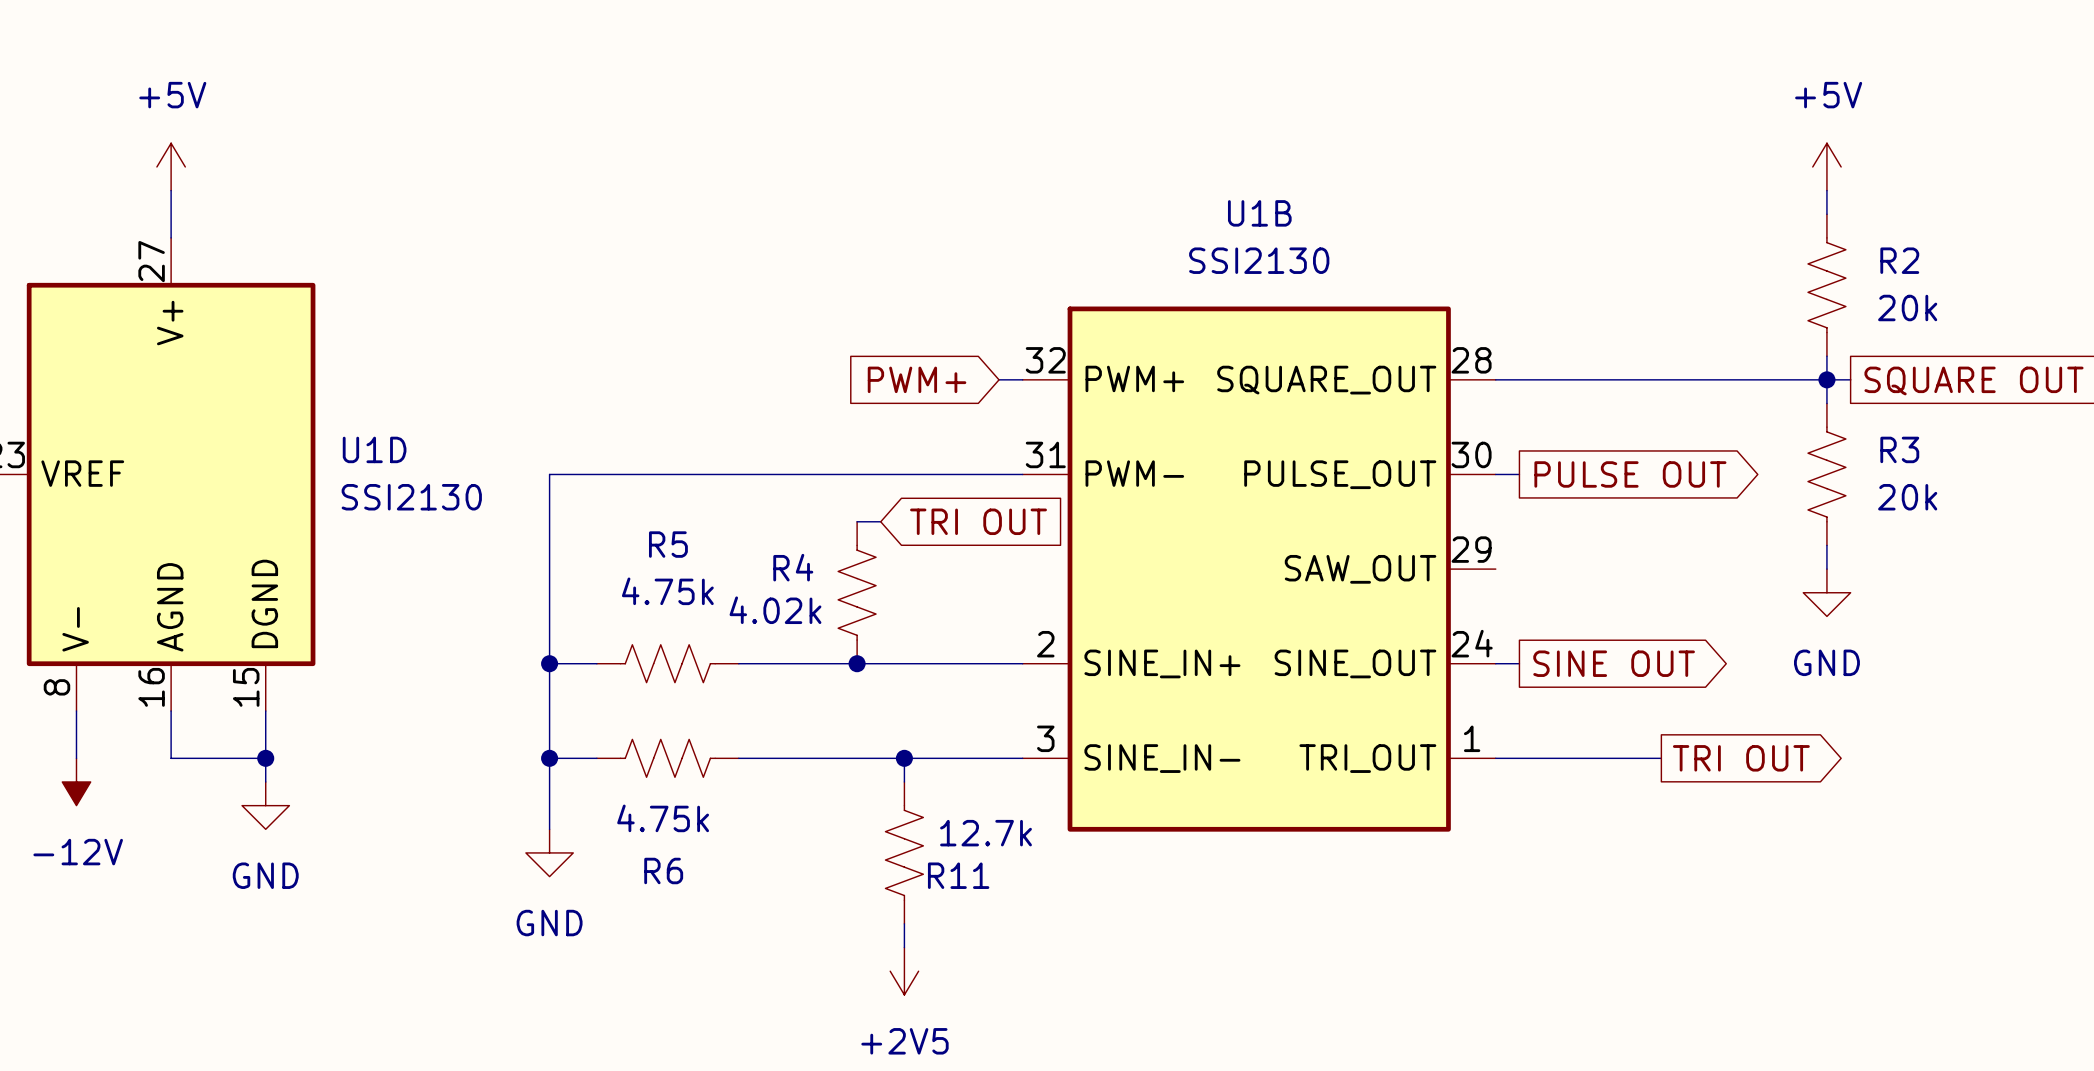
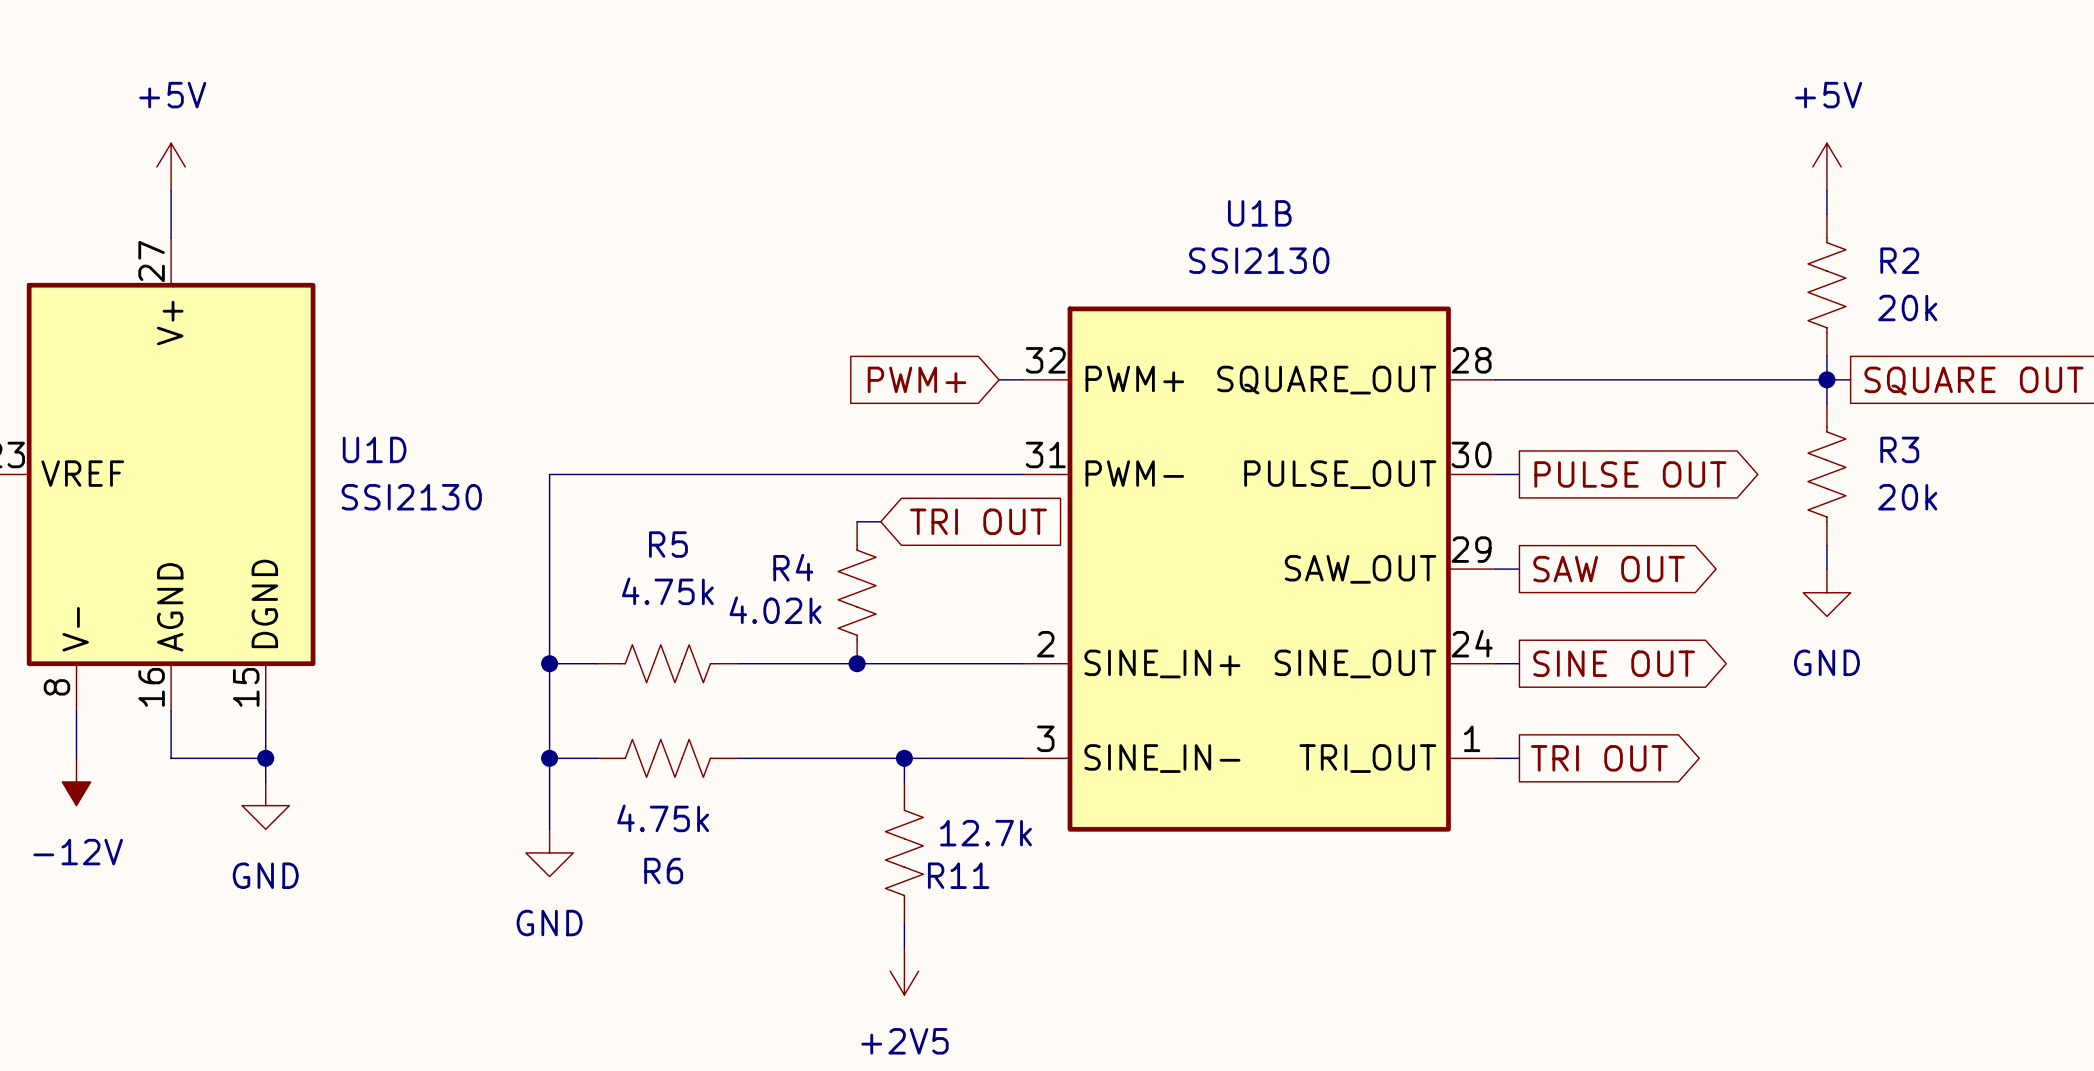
wire: none -> (1495, 569) (1519, 569)
global label: none -> SAW OUT (1609, 569)
wire: (1519, 758) (1661, 758) -> none
global label position: TRI OUT (1741, 758) -> TRI OUT (1599, 758)

